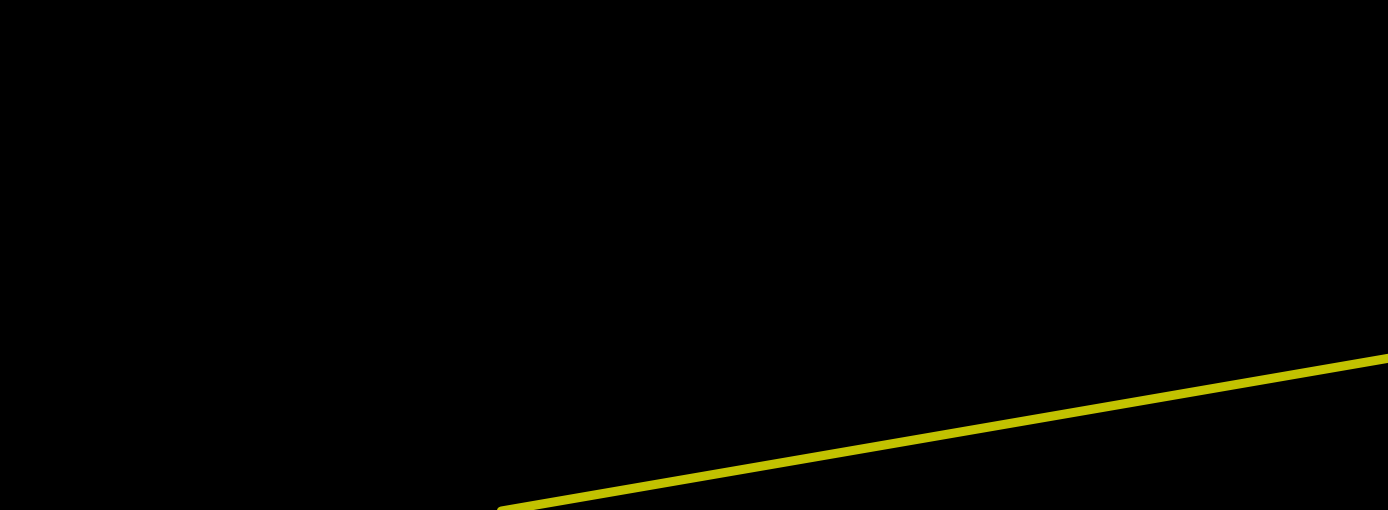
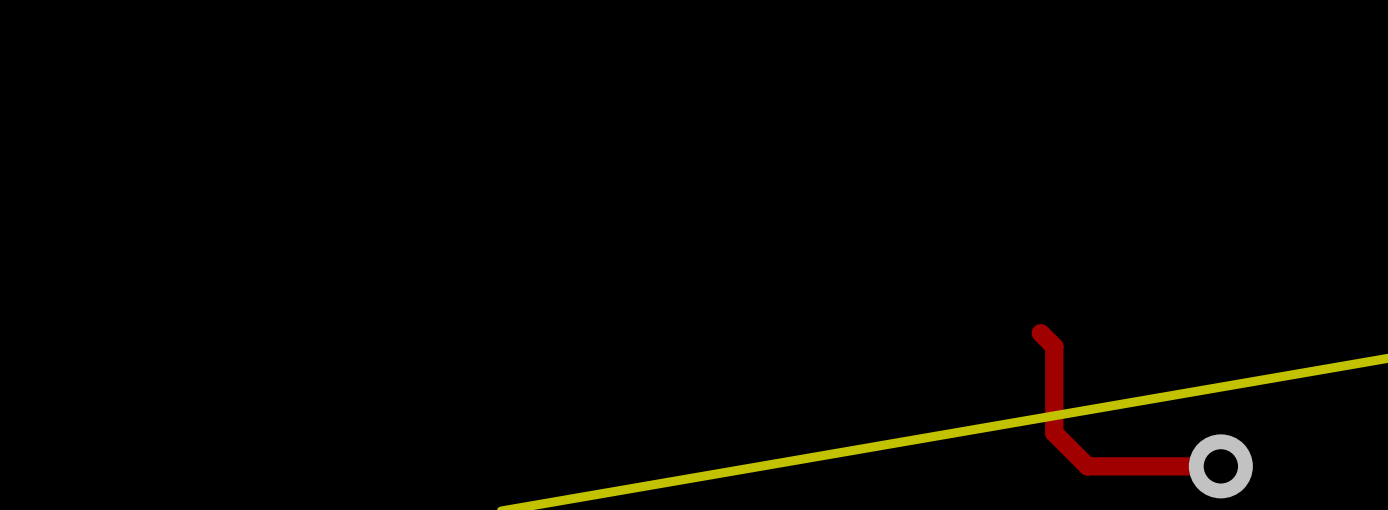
track: none -> (1040, 333) (1054, 346) (1054, 433) (1087, 466) (1220, 466)
via: none -> (1220, 466)

